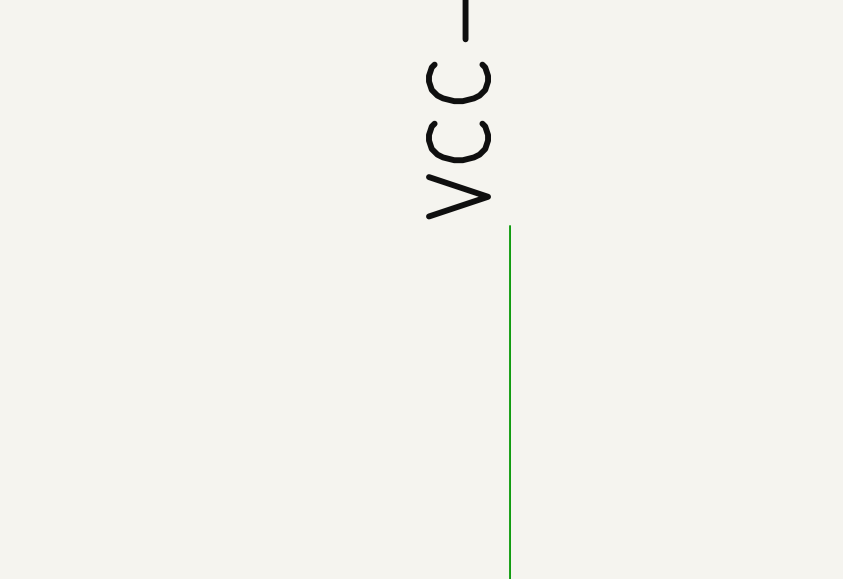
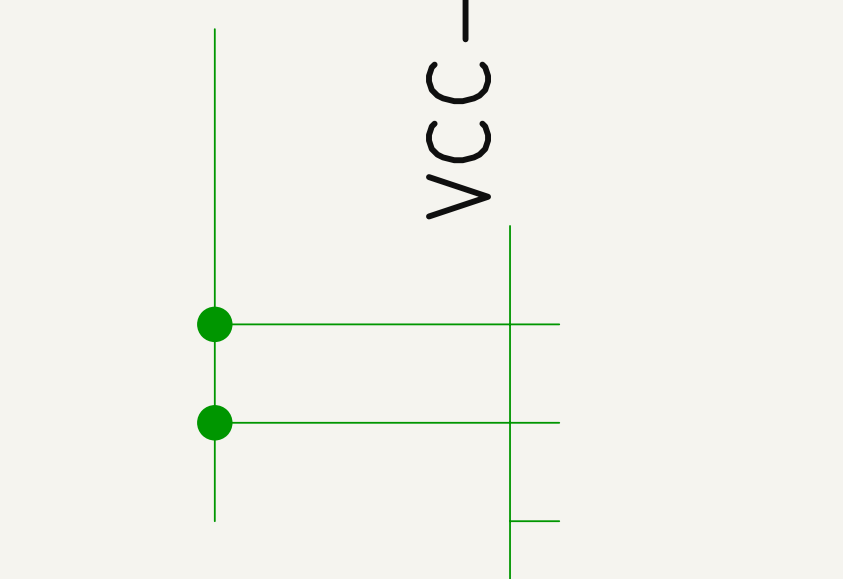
wire: none -> (214, 29) (214, 521)
wire: none -> (214, 324) (559, 324)
junction: none -> (214, 324)
wire: none -> (214, 422) (559, 422)
junction: none -> (214, 422)
wire: none -> (510, 521) (559, 521)

